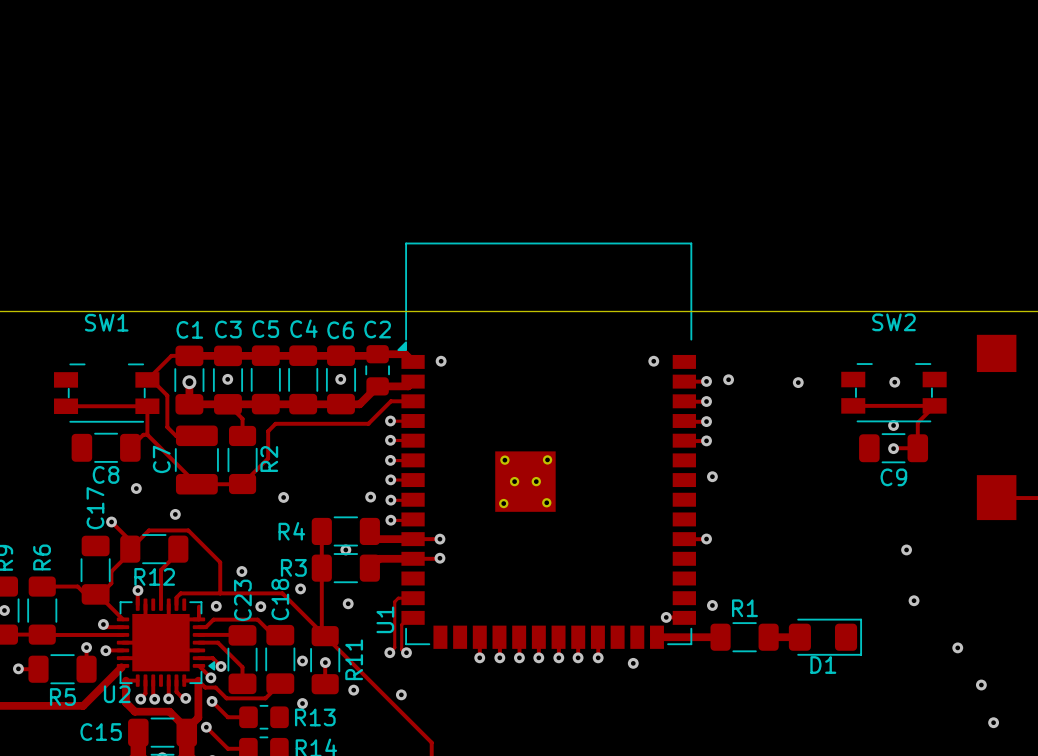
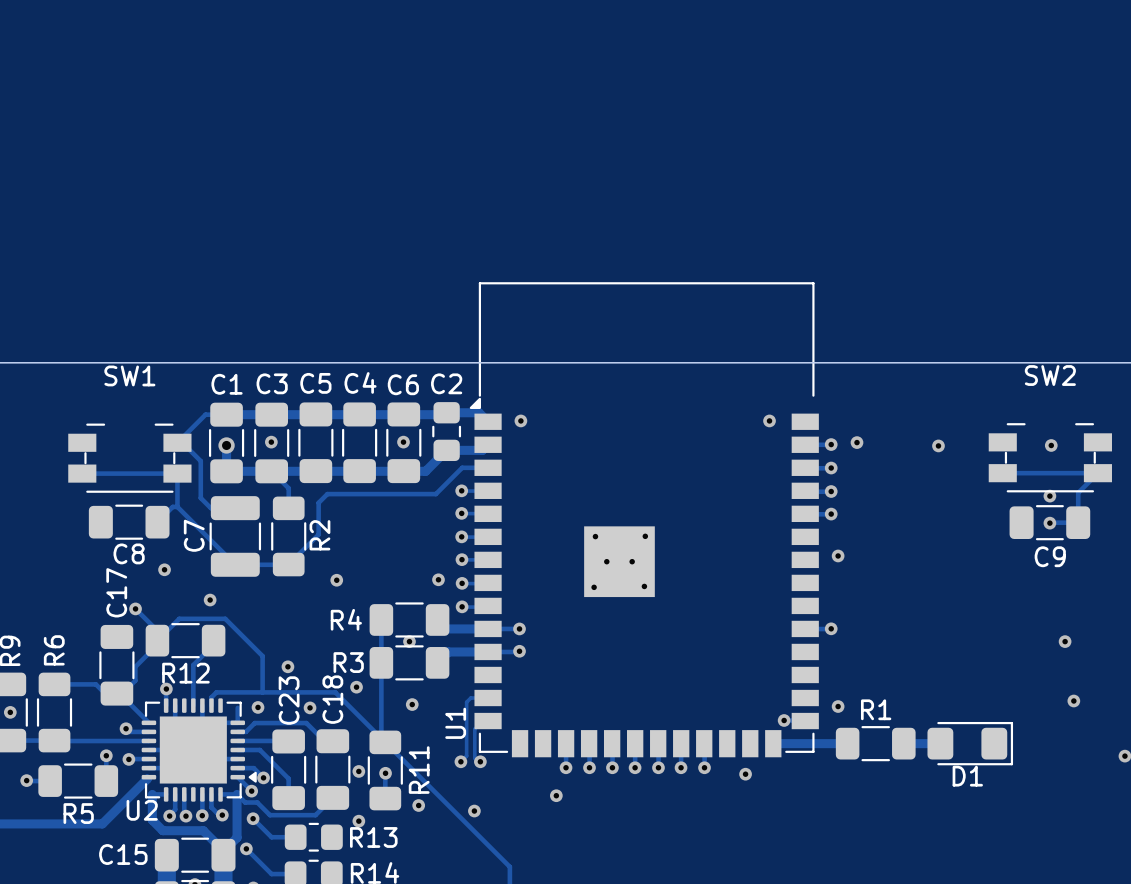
via: none -> (556, 795)

